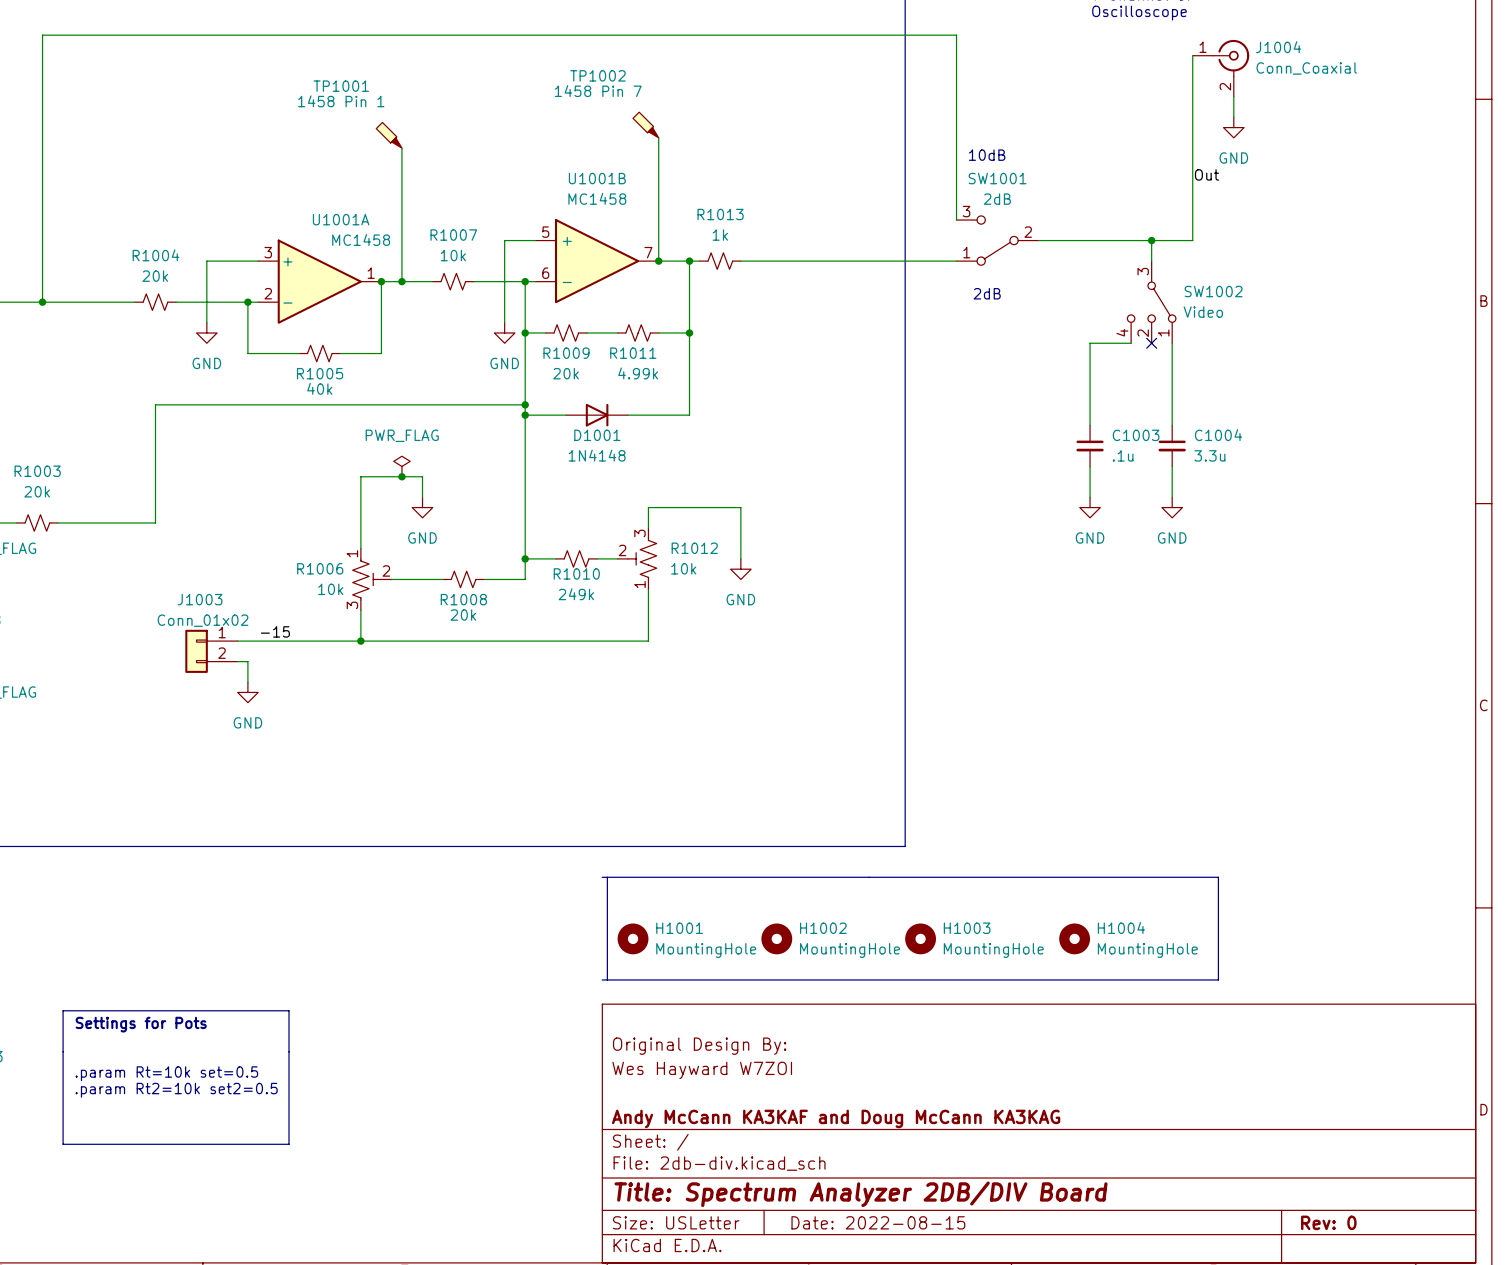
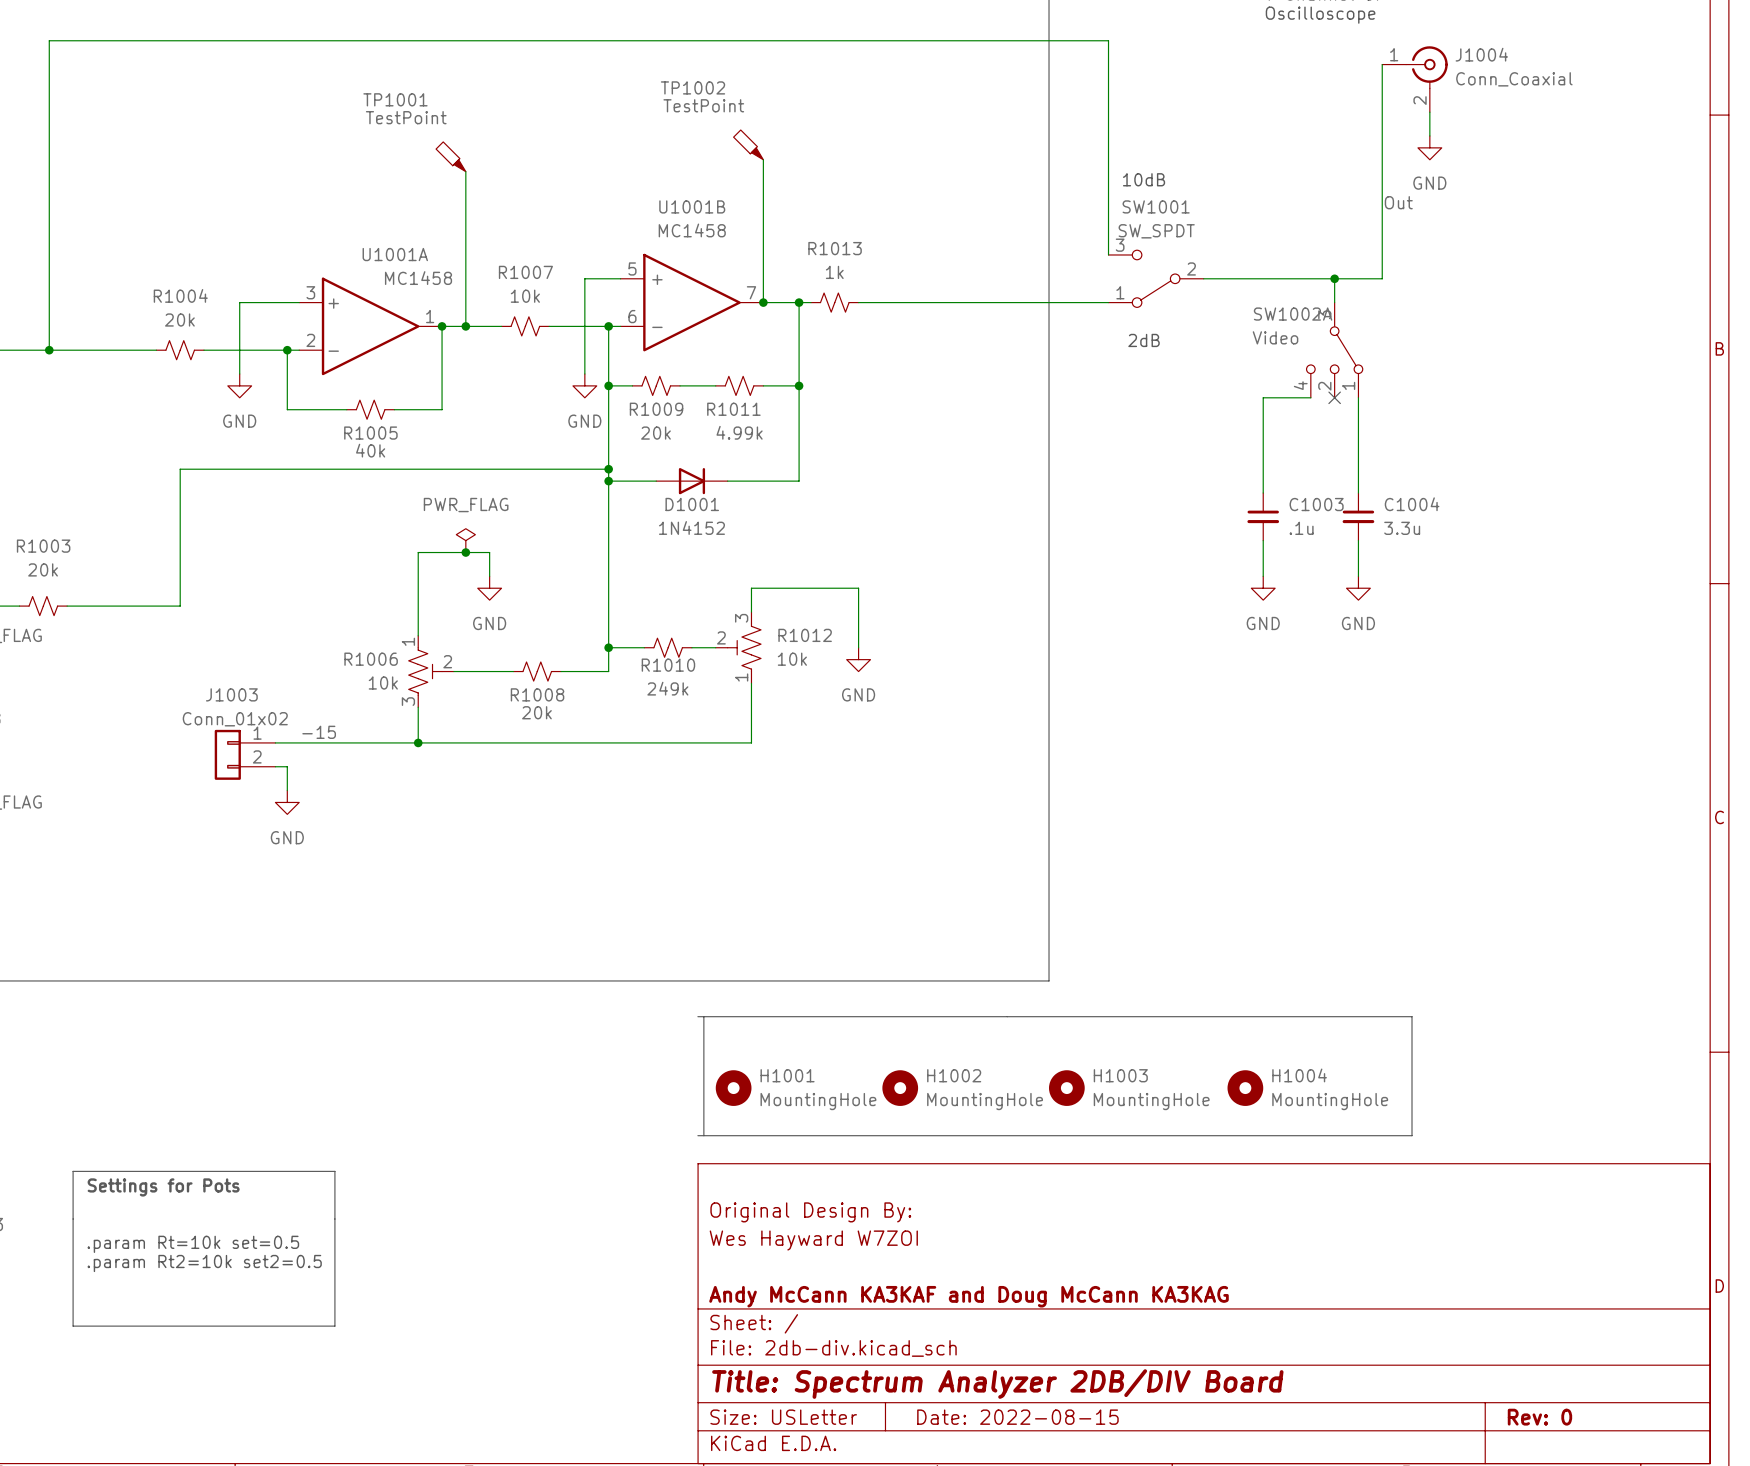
TP1002 value: 1458 Pin 7 (598, 91) -> TestPoint (703, 105)
TP1001 value: 1458 Pin 1 (341, 101) -> TestPoint (406, 117)
SW1001 value: 2dB (997, 199) -> SW_SPDT (1156, 231)
SW1002 name: SW1002 (1213, 291) -> SW1002A (1293, 314)
SW1002 value position: Video (1203, 312) -> Video (1275, 337)
D1001 value: 1N4148 (597, 455) -> 1N4152 (691, 527)

